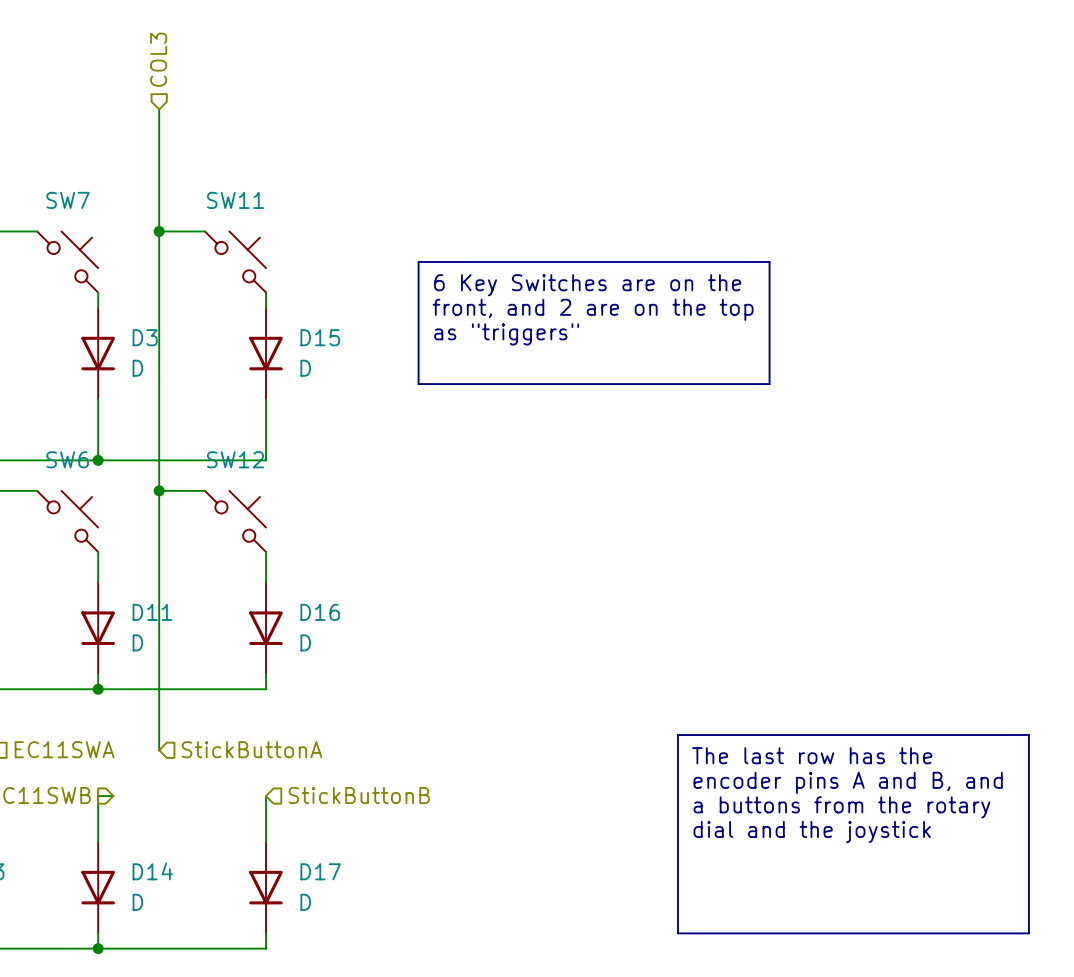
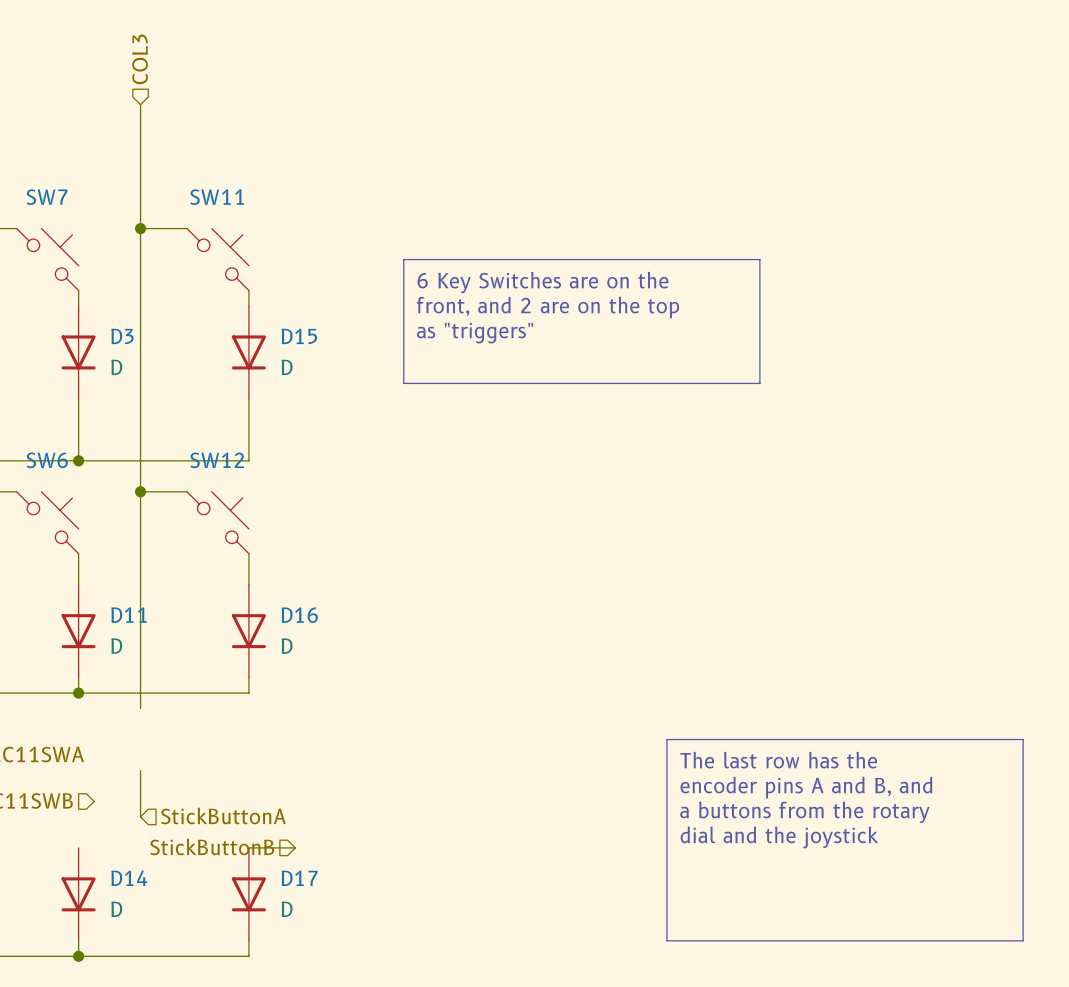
wire: (159, 704) (159, 750) -> (140, 770) (140, 816)
hierarchical label position: StickButtonA (252, 749) -> StickButtonA (223, 815)
hierarchical label rotation: 0° (359, 795) -> 180° (212, 846)
wire: (113, 796) (98, 796) (98, 841) -> none
wire: (266, 796) (266, 841) -> (295, 847) (248, 847)

